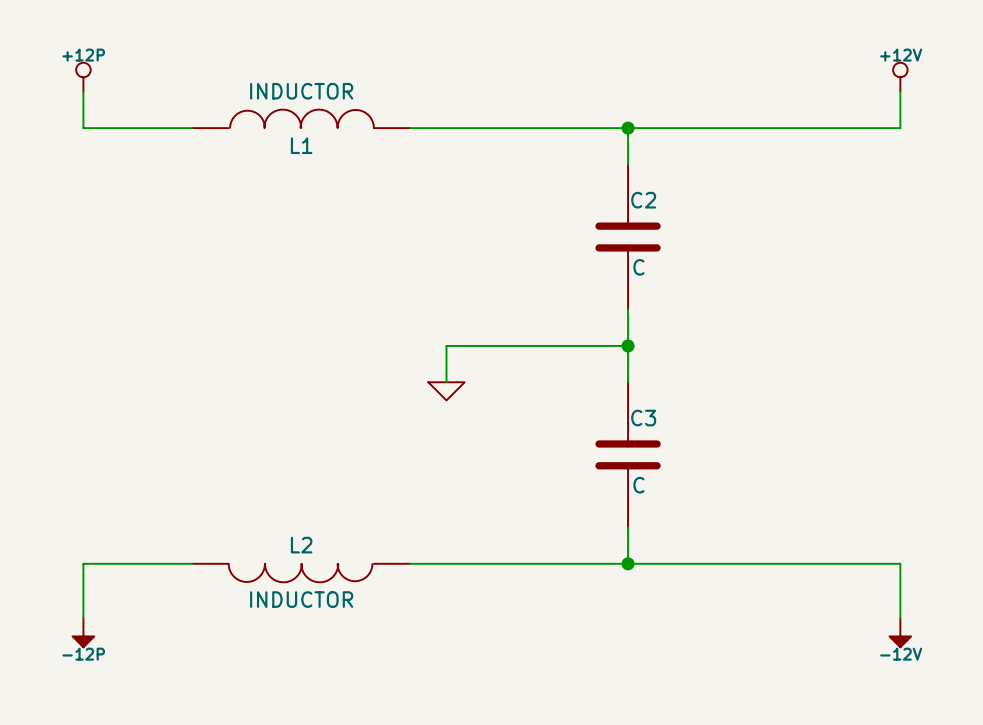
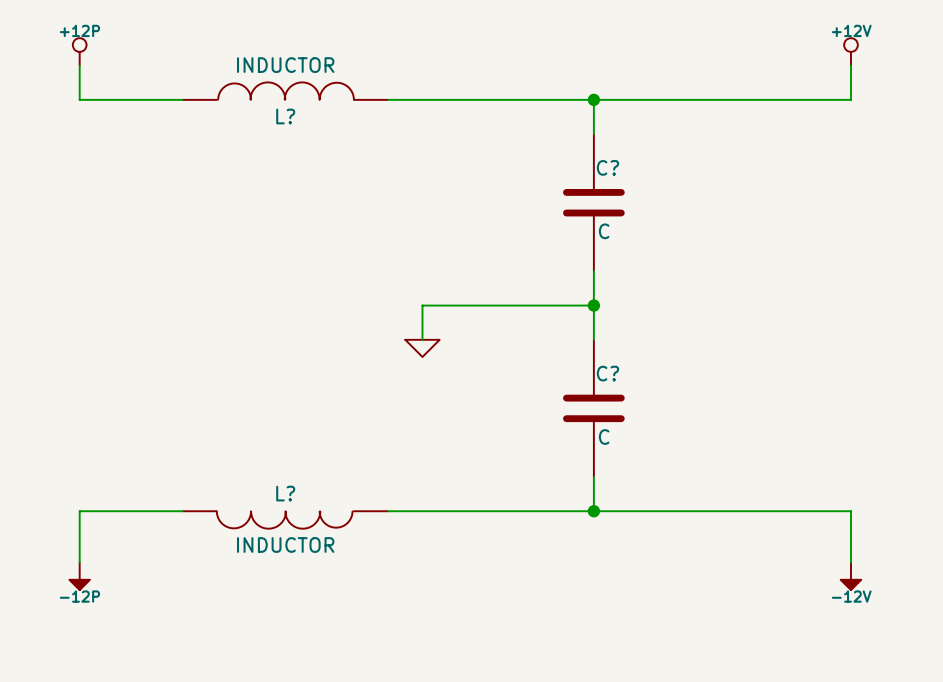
L1 name: L1 (301, 145) -> L? (285, 116)
C2 name: C2 (643, 200) -> C? (607, 167)
C3 name: C3 (643, 418) -> C? (607, 373)
L2 name: L2 (301, 545) -> L? (285, 493)

